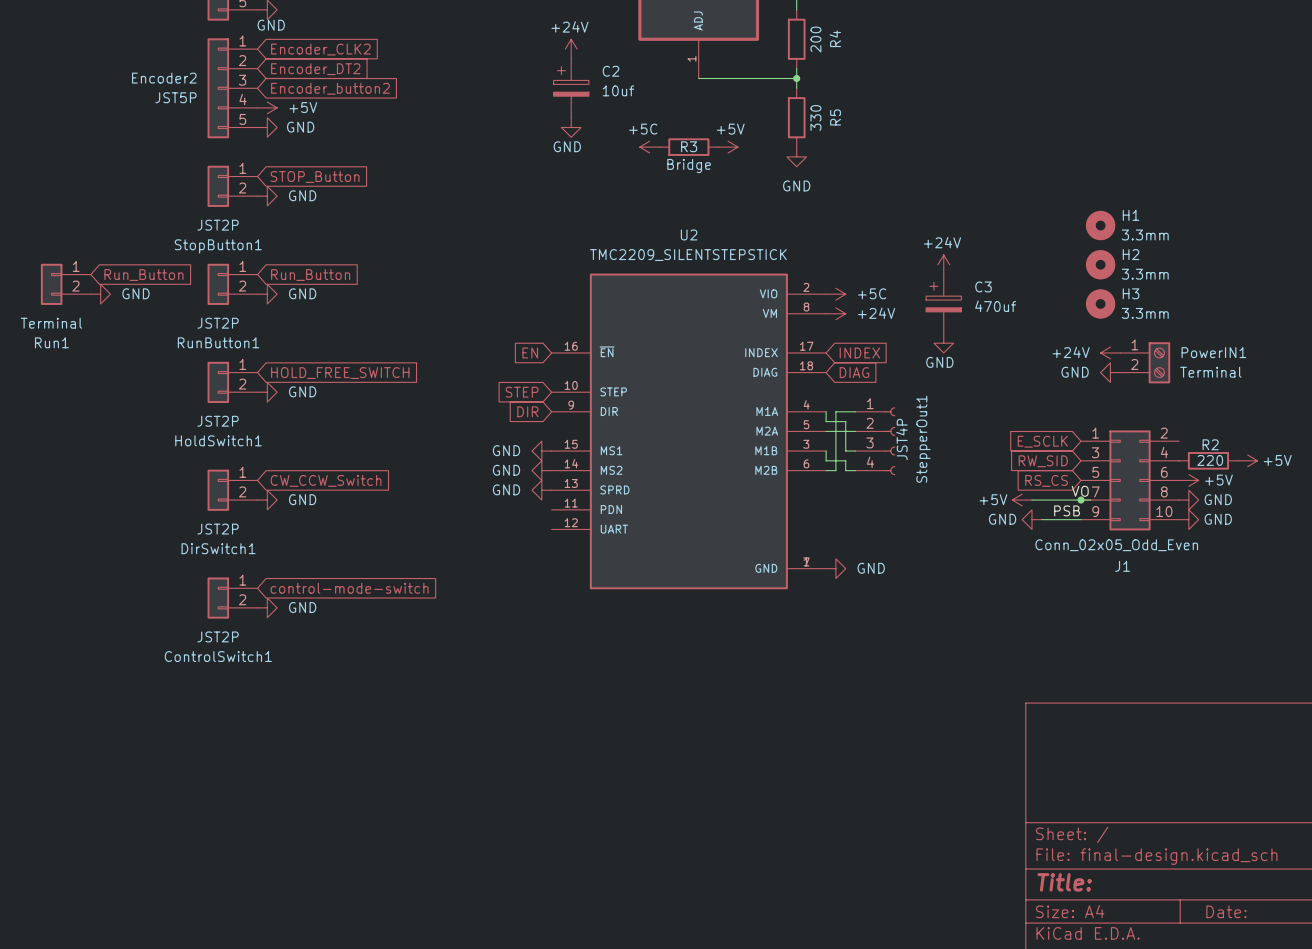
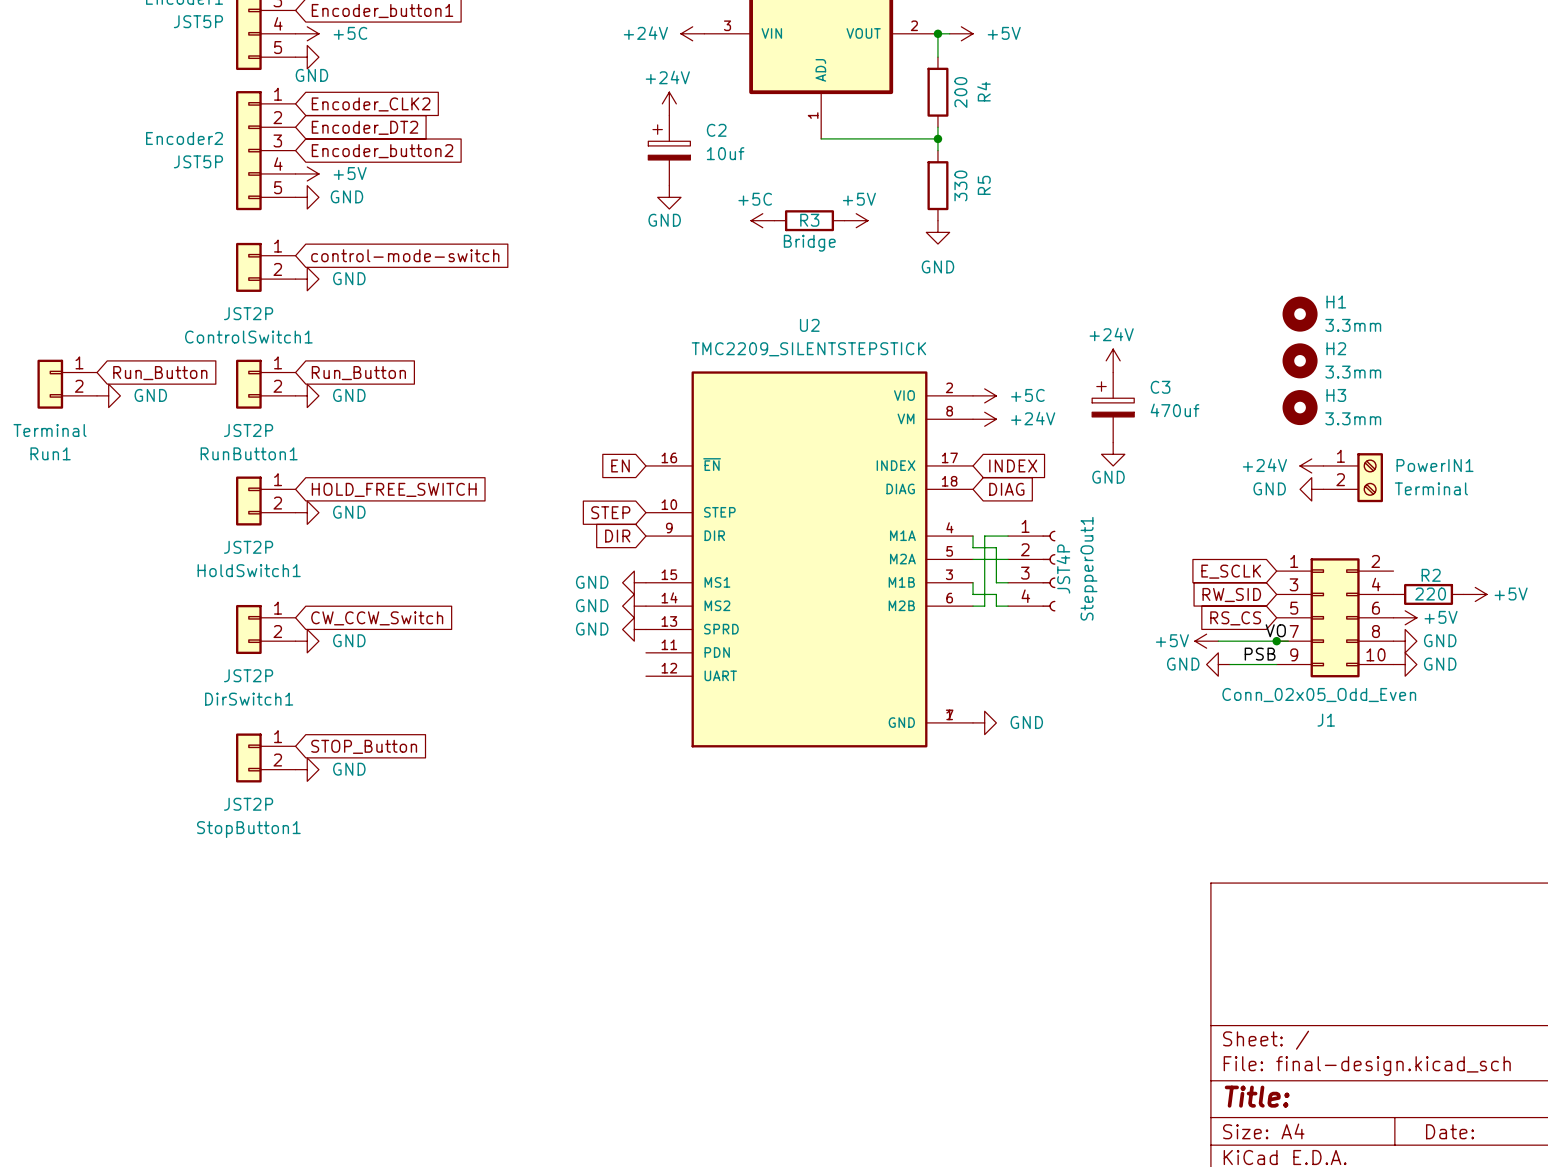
global label: STOP_Button (315, 176) -> control-mode-switch (405, 255)
StopButton1 name: StopButton1 (218, 246) -> ControlSwitch1 (248, 337)
global label: control-mode-switch (349, 588) -> STOP_Button (364, 746)
ControlSwitch1 name: ControlSwitch1 (218, 656) -> StopButton1 (248, 829)

